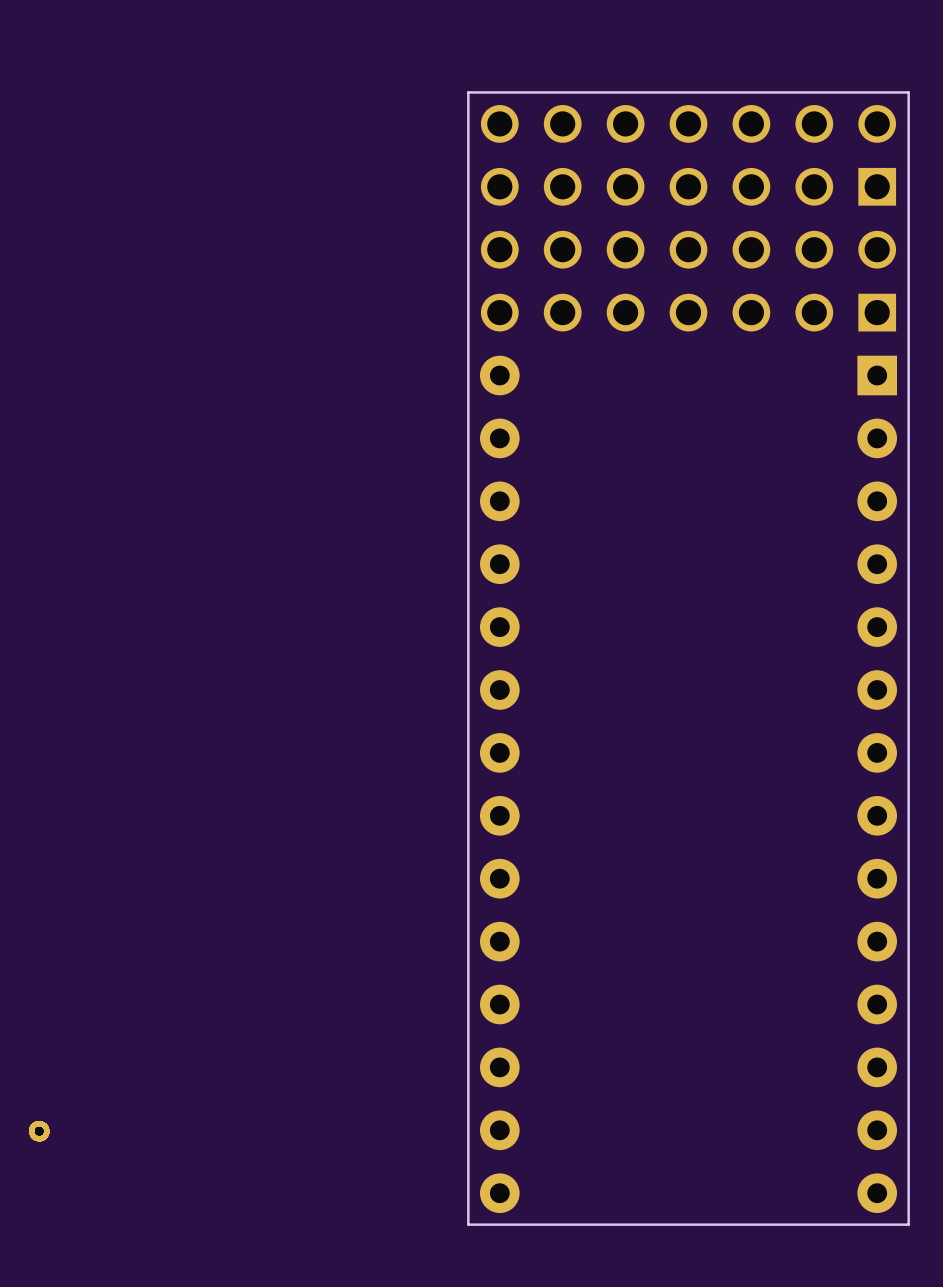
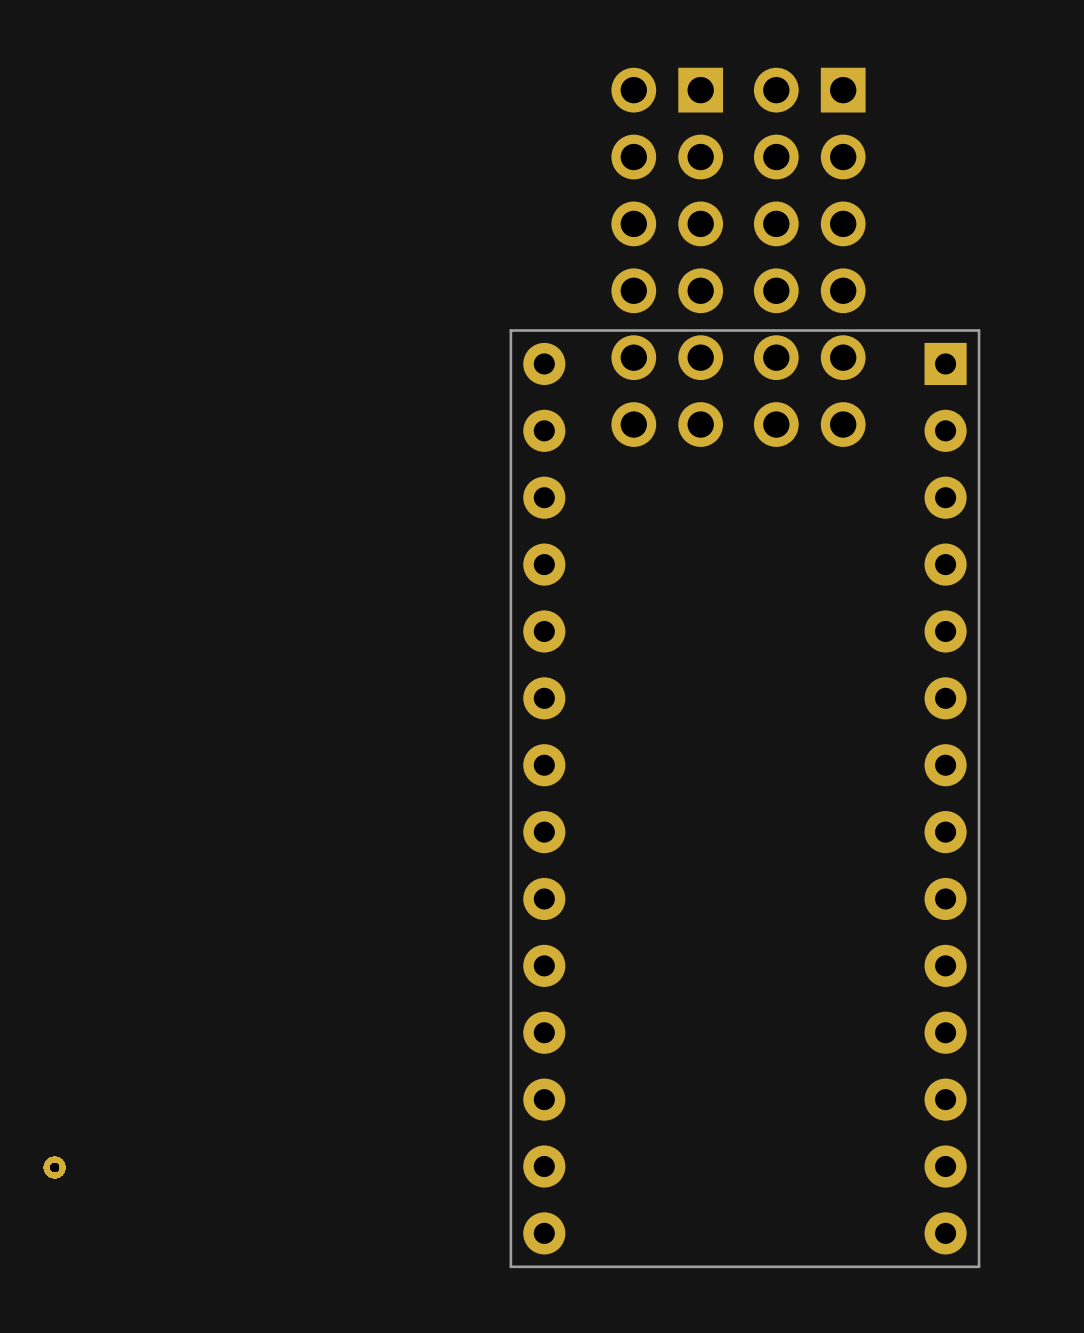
part: (688, 155) -> none
part: none -> (667, 257)
part: none -> (809, 257)
part: (688, 281) -> none
board edge: (908, 344) (908, 92) (468, 92) (468, 344) -> (979, 330) (510, 330)

